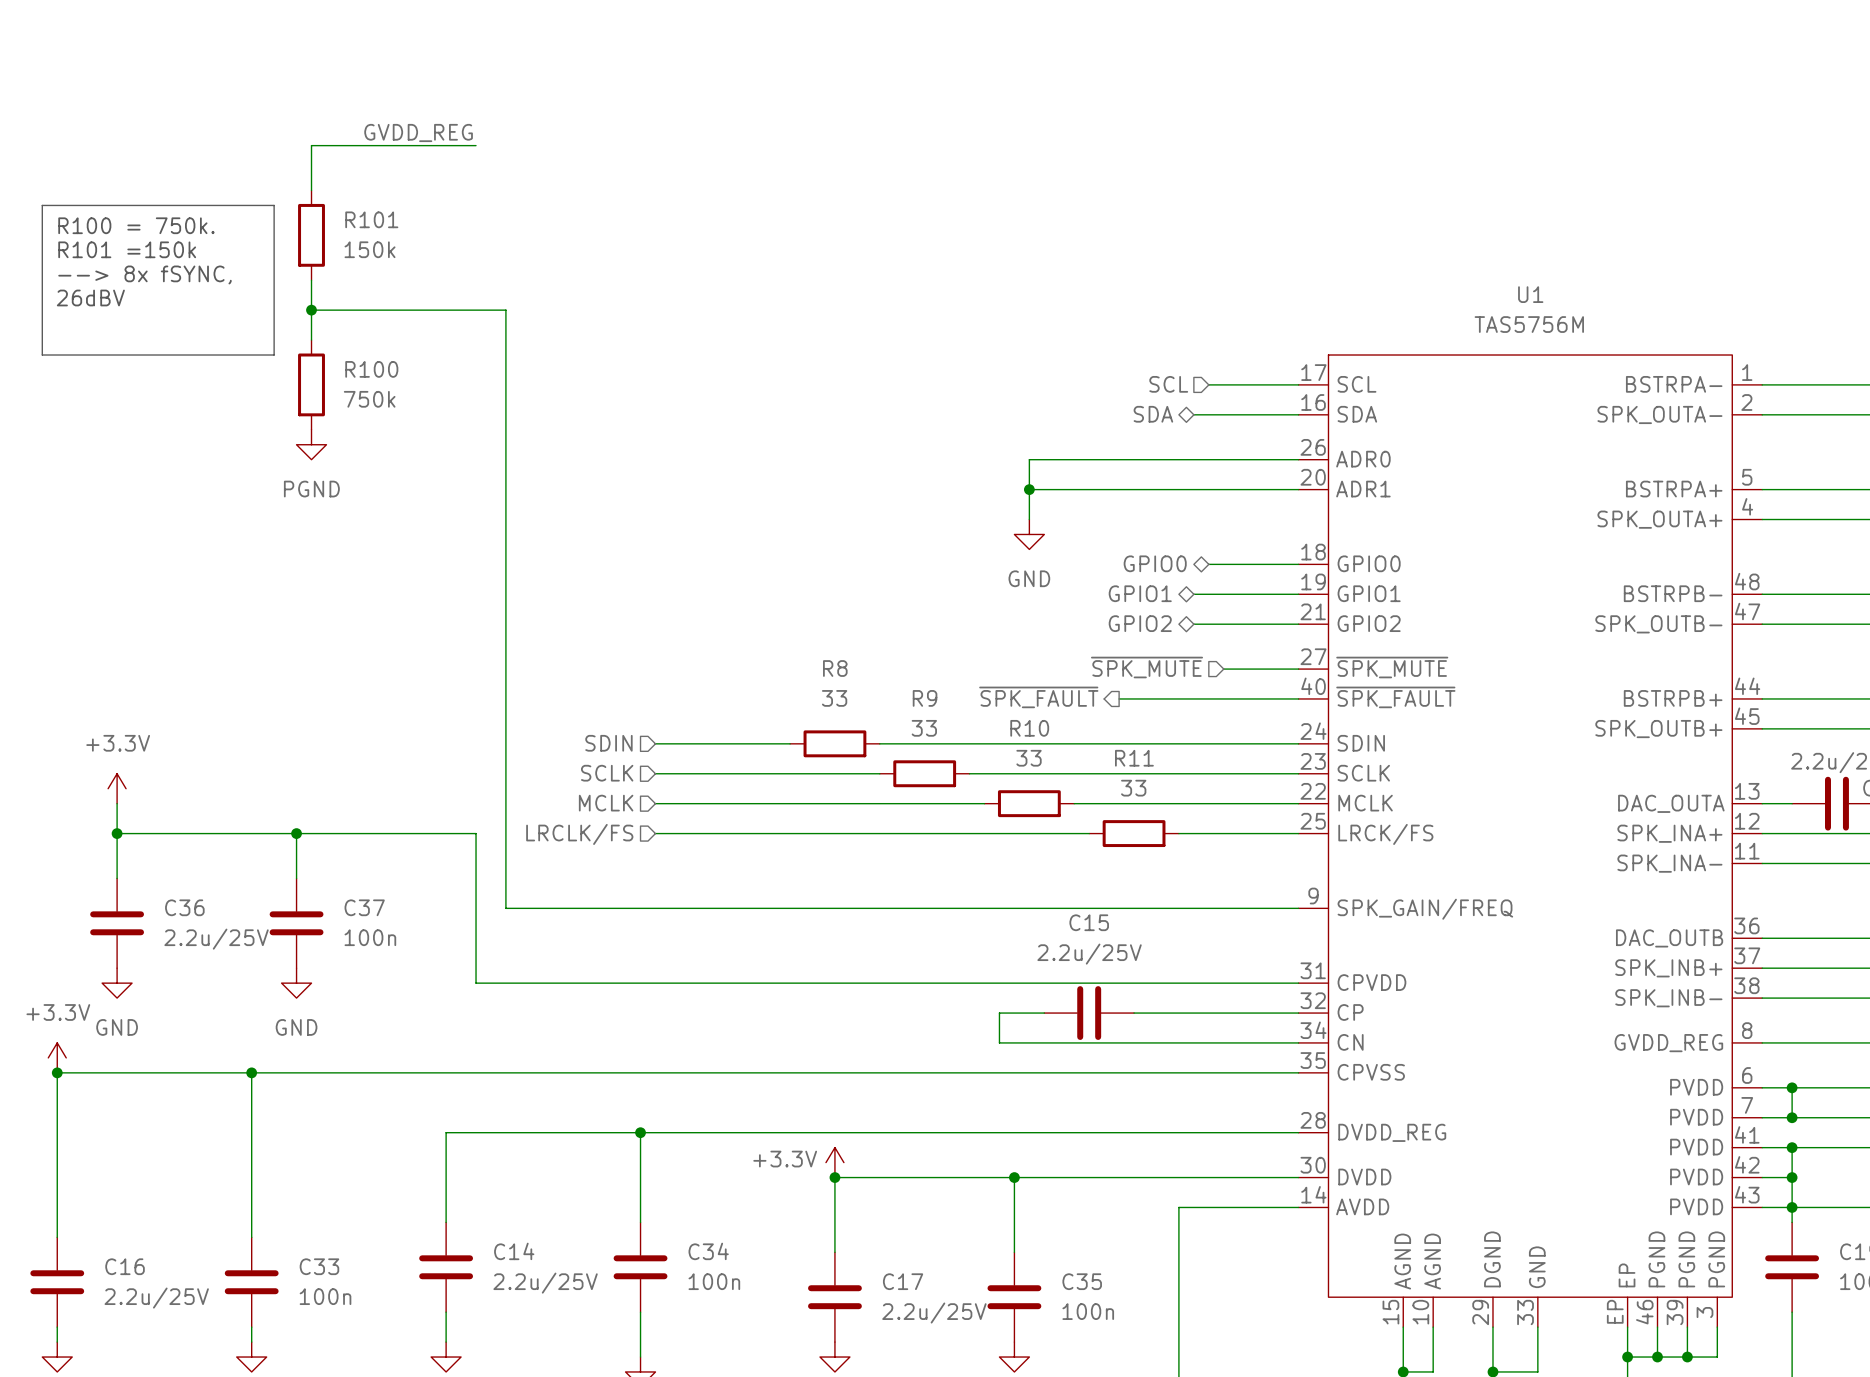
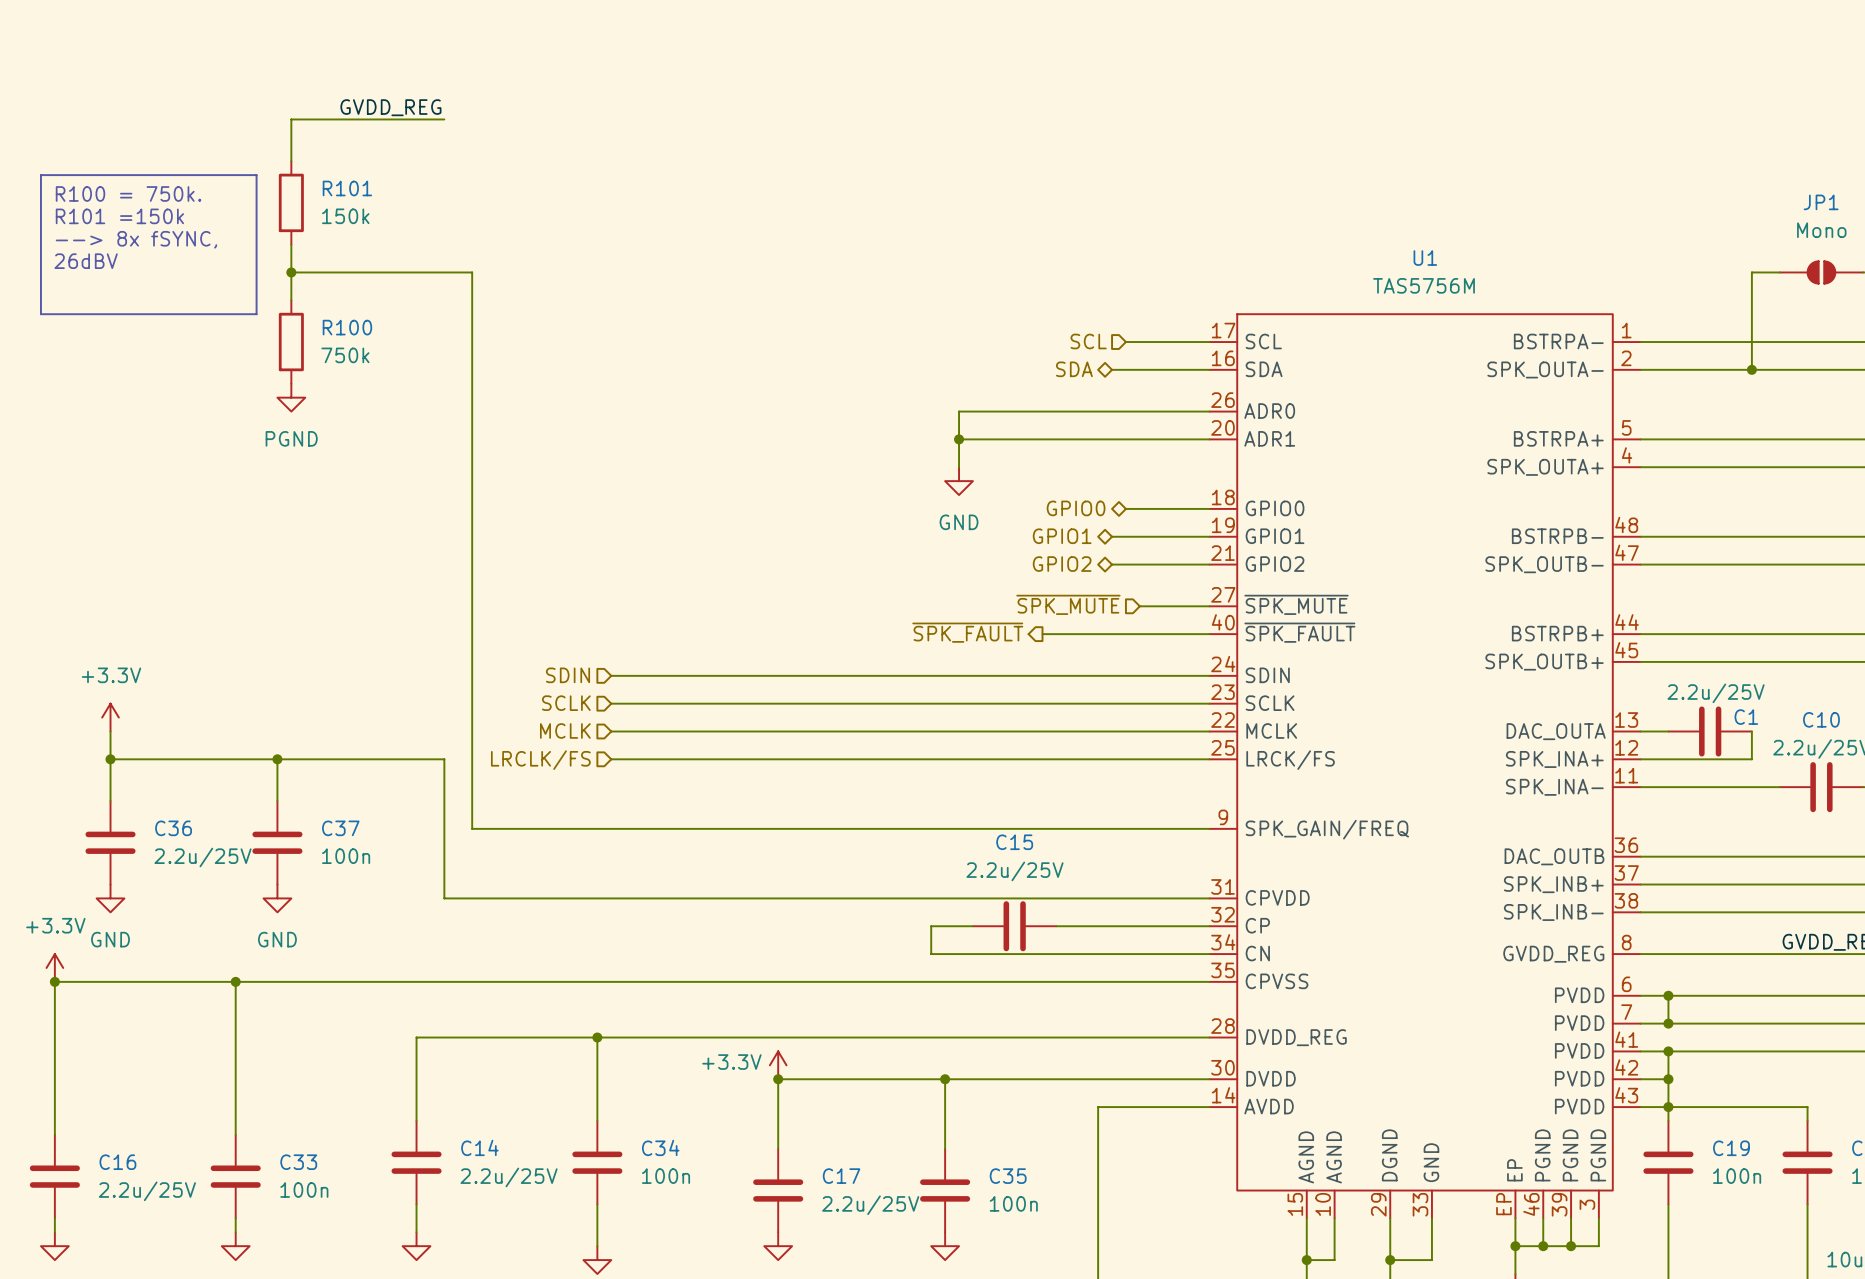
wire: none -> (736, 675) (819, 675)
R8: 33 (834, 743) -> none
wire: none -> (819, 703) (903, 703)
R9: 33 (924, 773) -> none
wire: none -> (917, 731) (1000, 731)
R10: 33 (1029, 803) -> none
wire: none -> (1014, 759) (1098, 759)
R11: 33 (1134, 833) -> none

